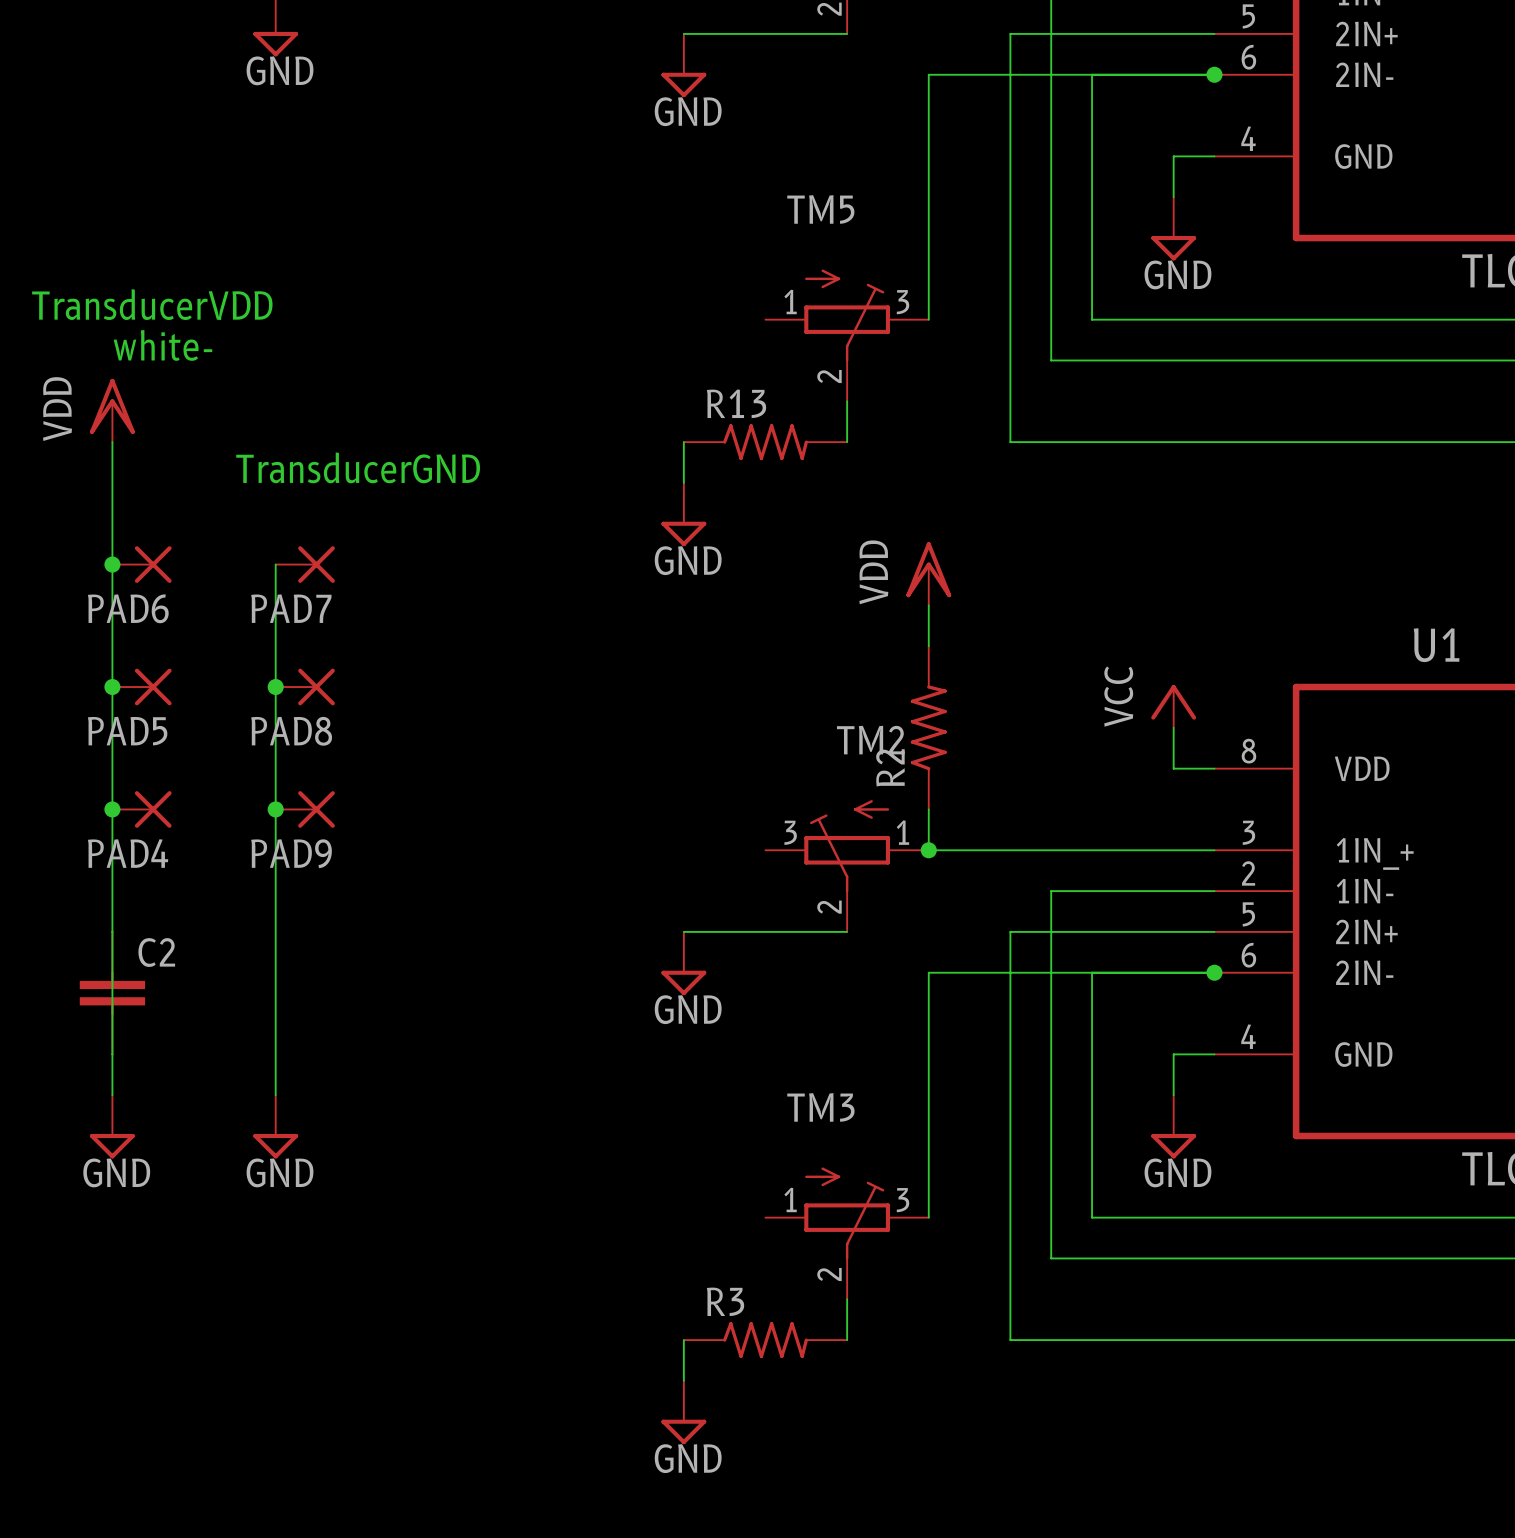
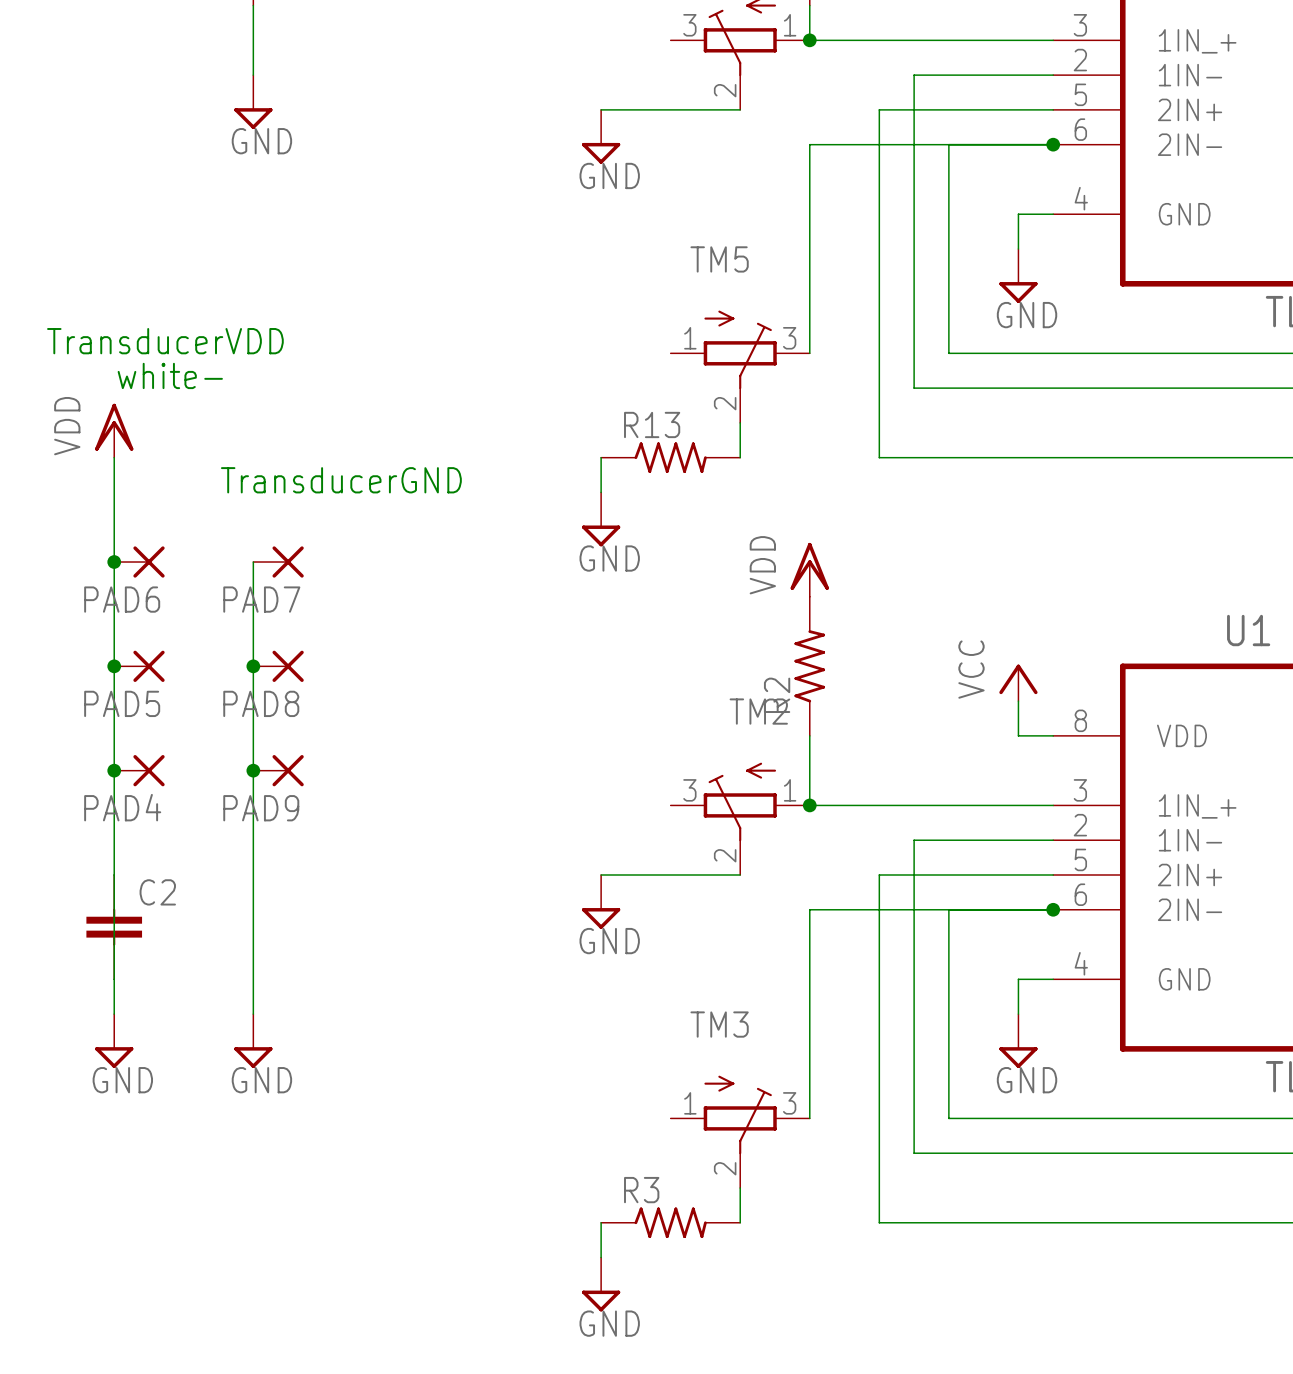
R2 position: (928, 727) -> (809, 666)

